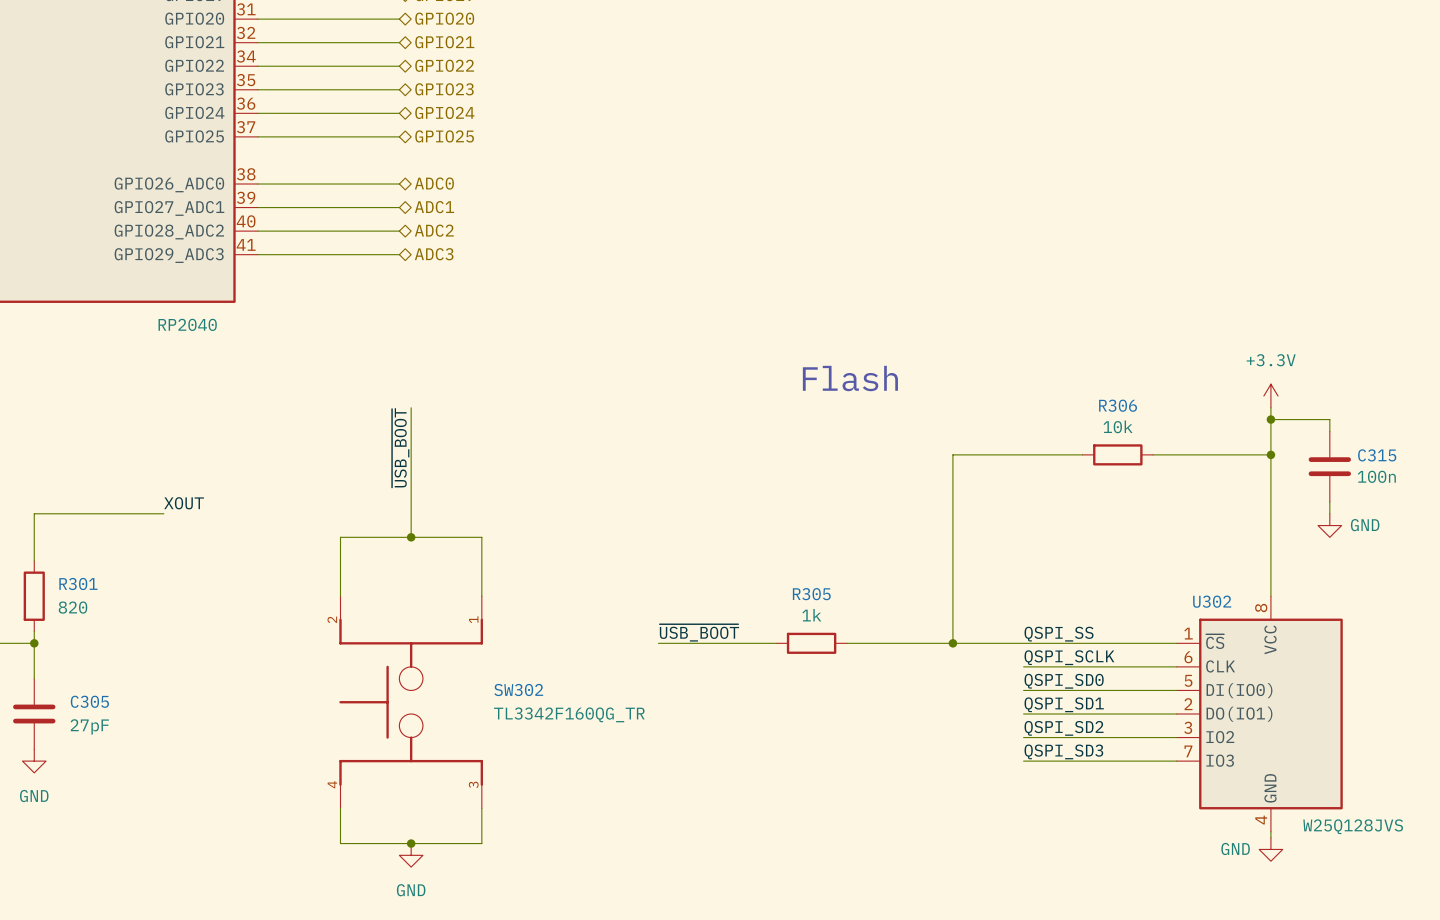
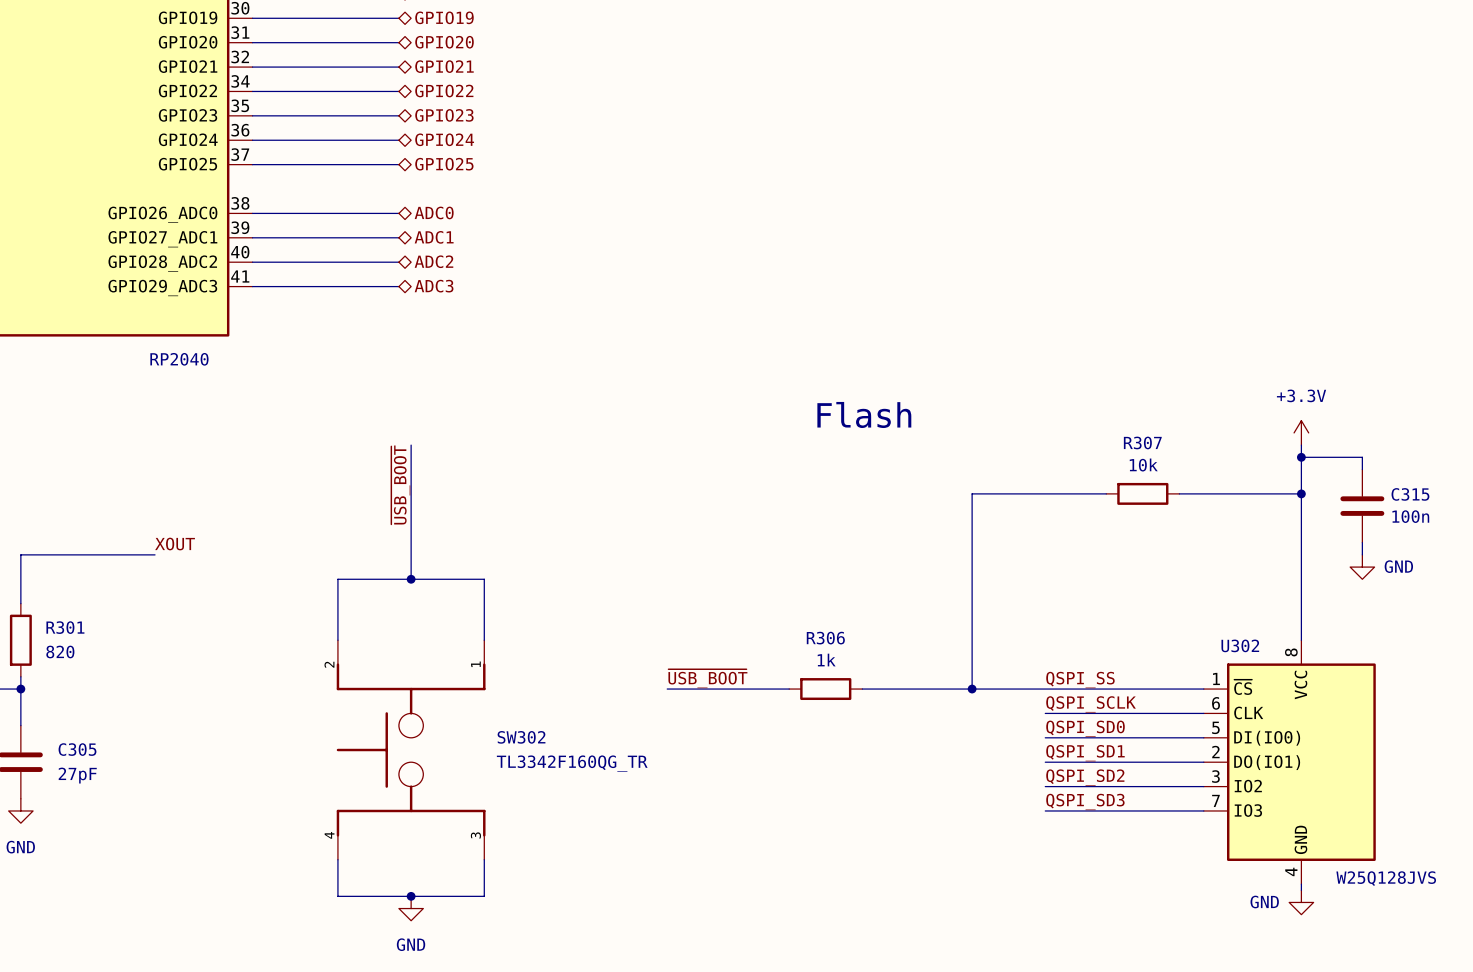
R306 name: R306 (1118, 405) -> R307 (1142, 442)
R305 name: R305 (811, 594) -> R306 (825, 638)

